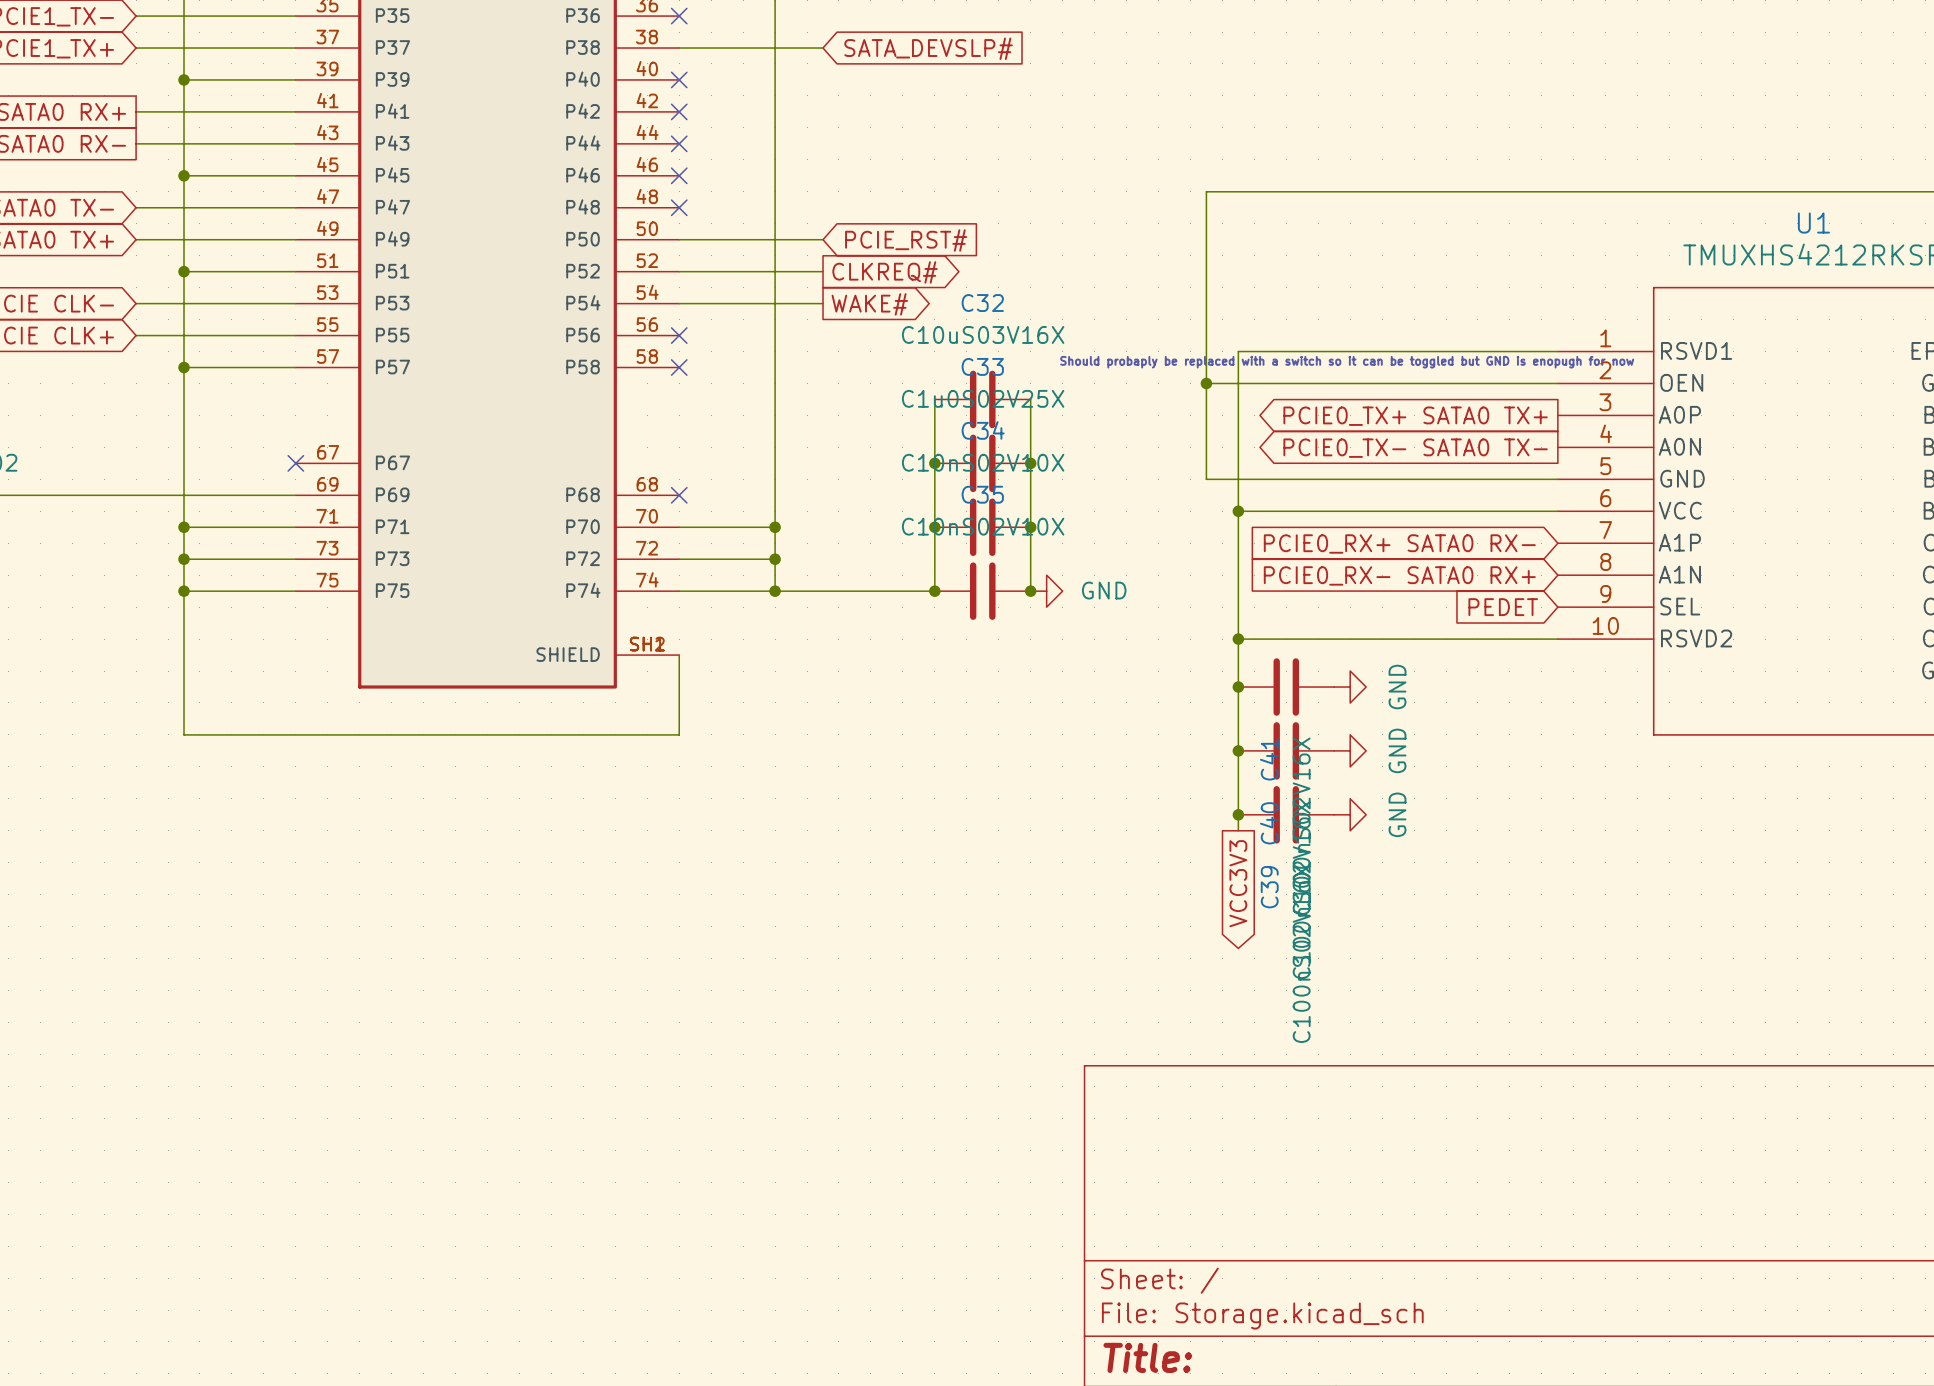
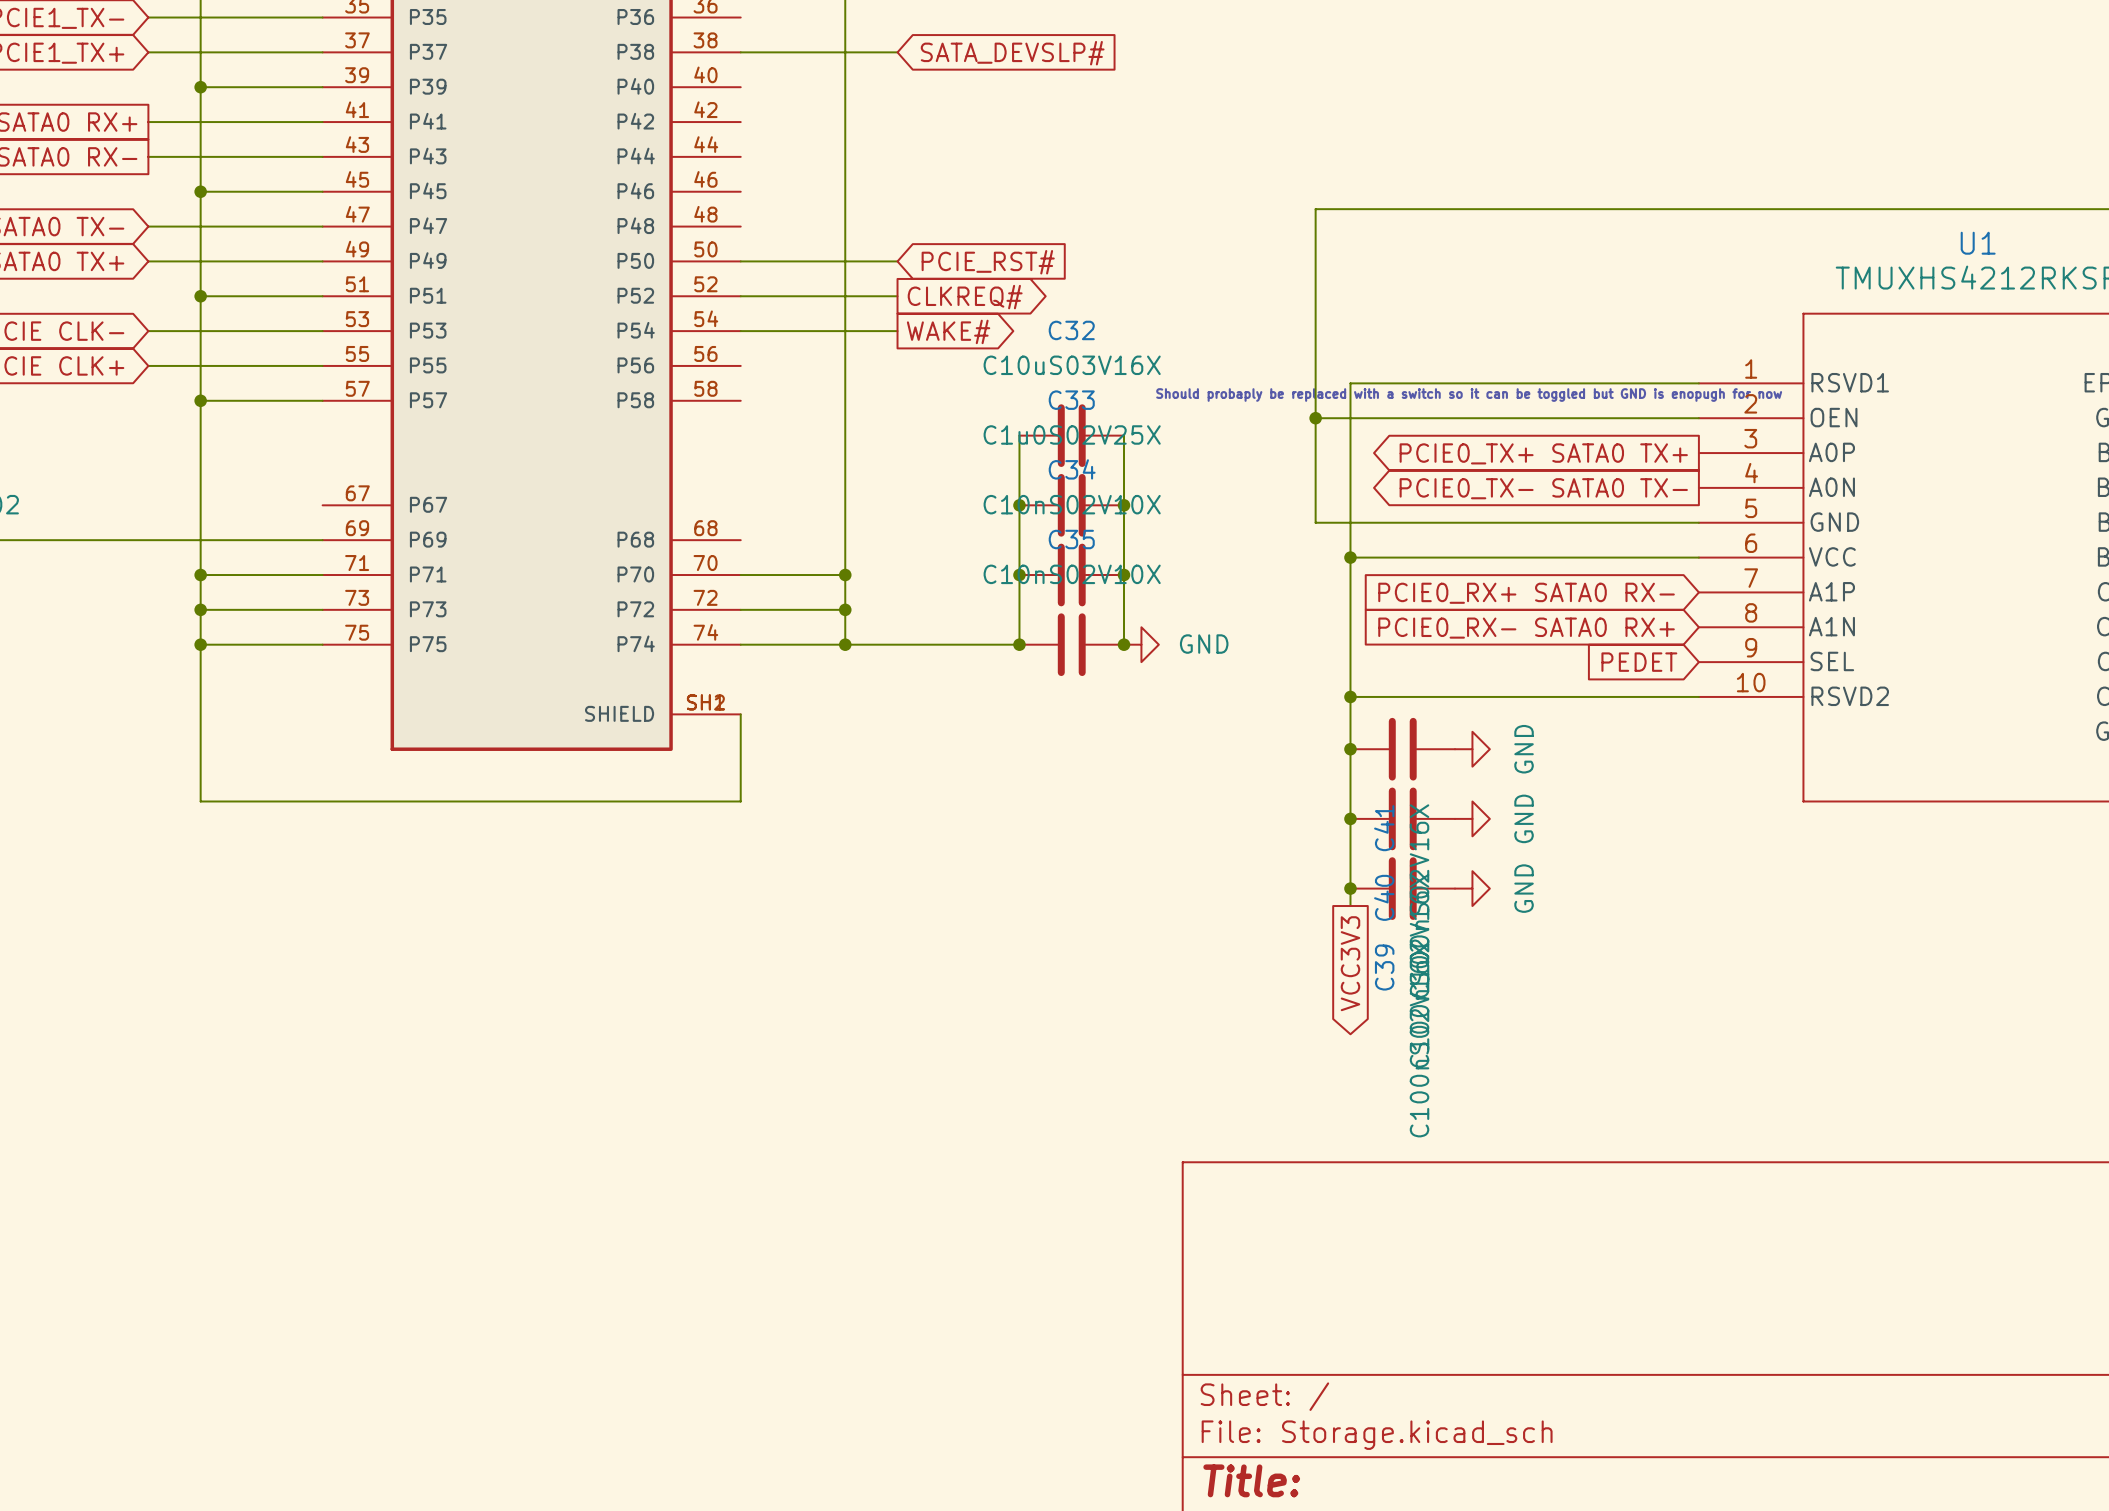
no-connect mark: (679, 16) -> none
no-connect mark: (679, 79) -> none
no-connect mark: (679, 111) -> none
no-connect mark: (679, 143) -> none
no-connect mark: (679, 175) -> none
no-connect mark: (679, 207) -> none
no-connect mark: (679, 335) -> none
no-connect mark: (679, 367) -> none
no-connect mark: (295, 463) -> none
no-connect mark: (679, 495) -> none

